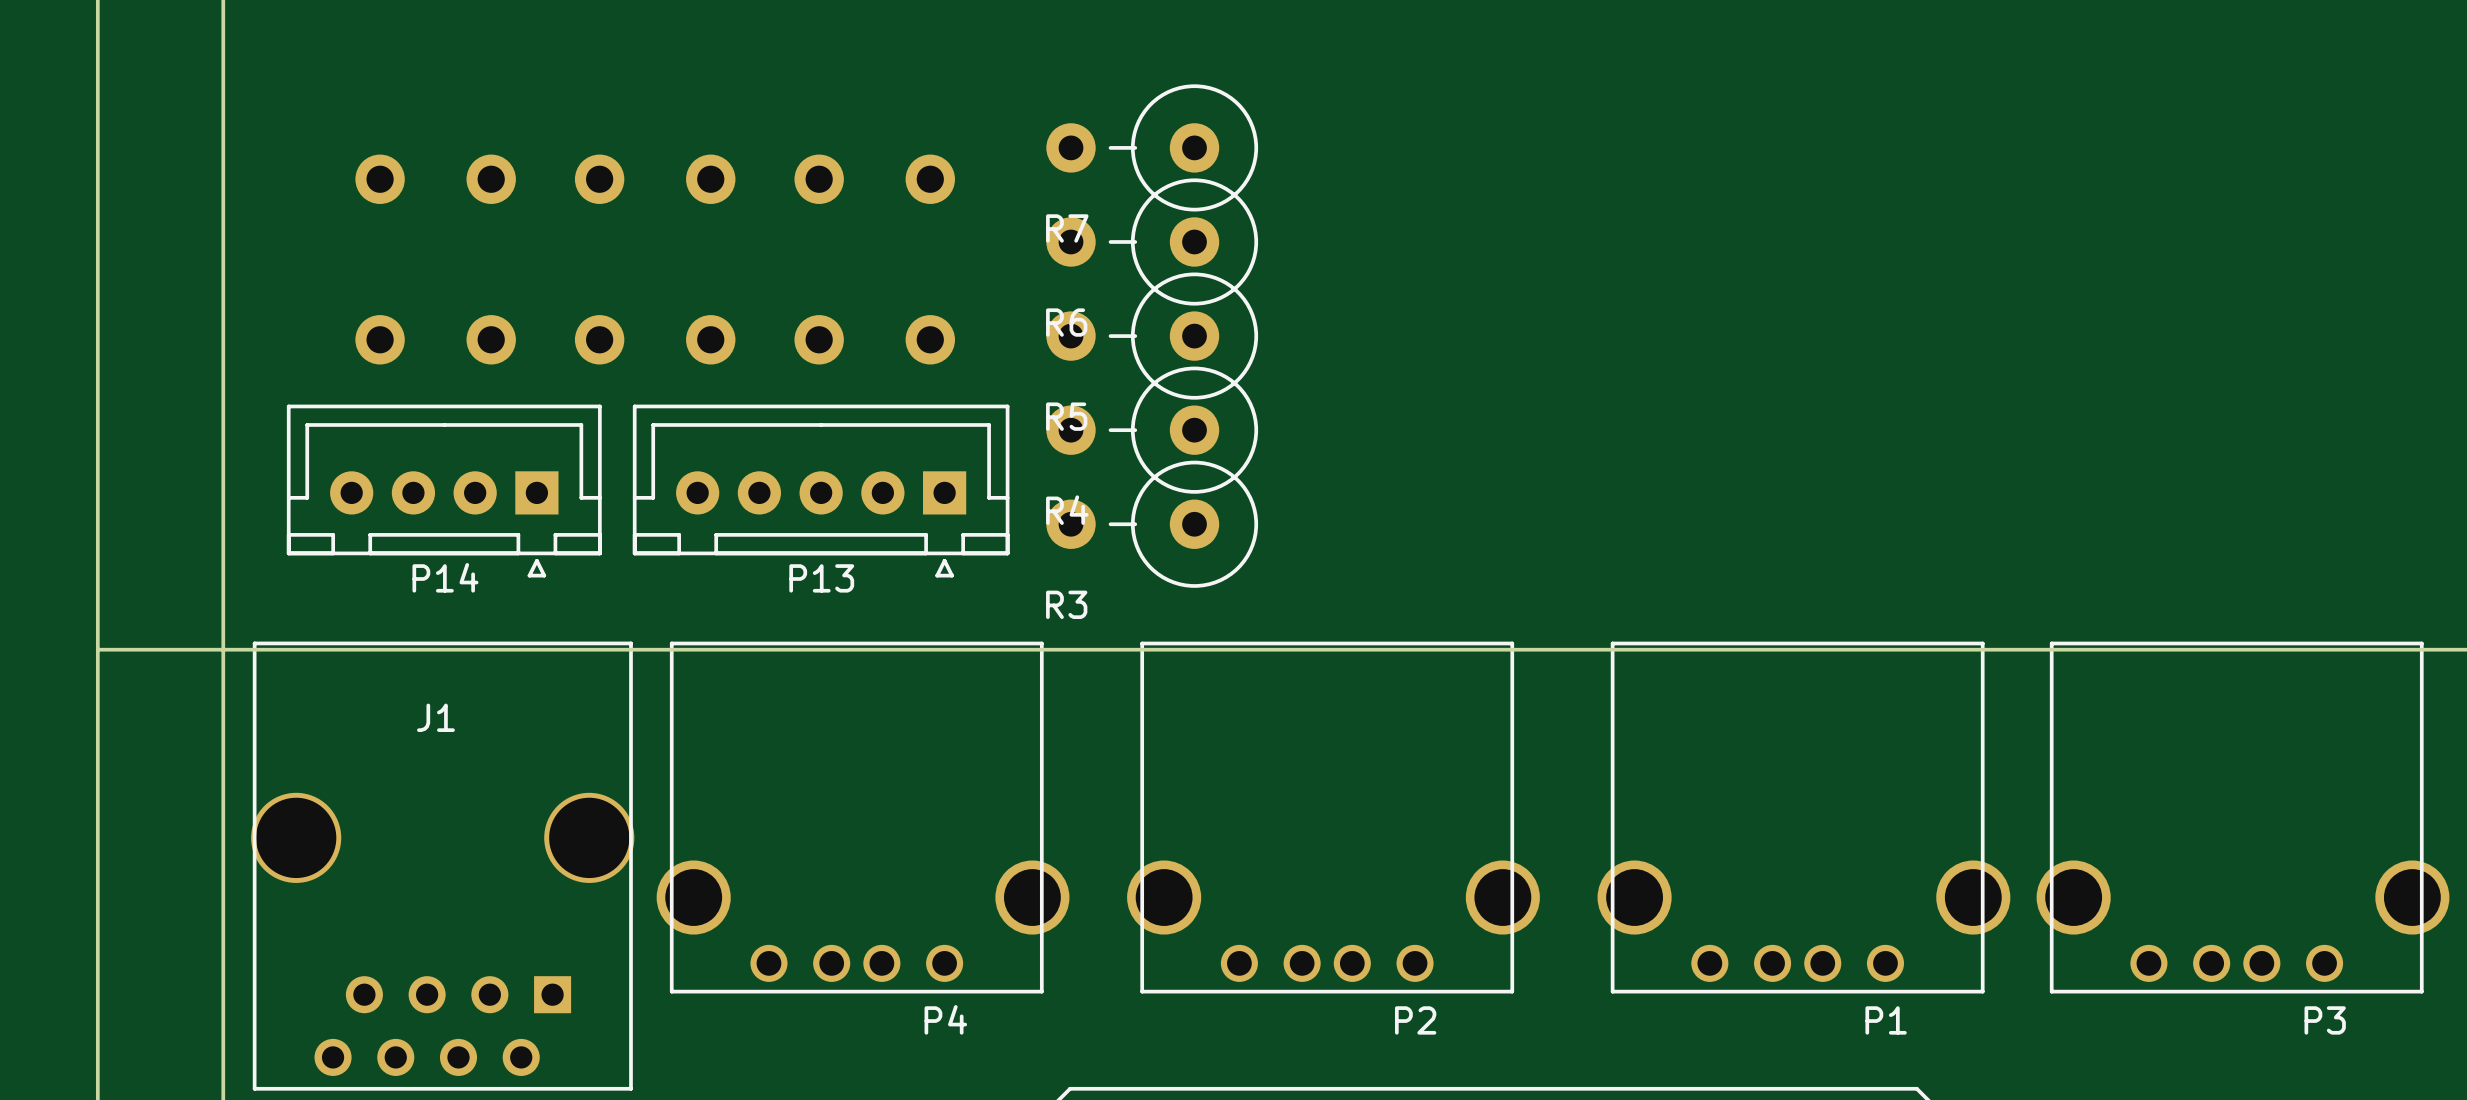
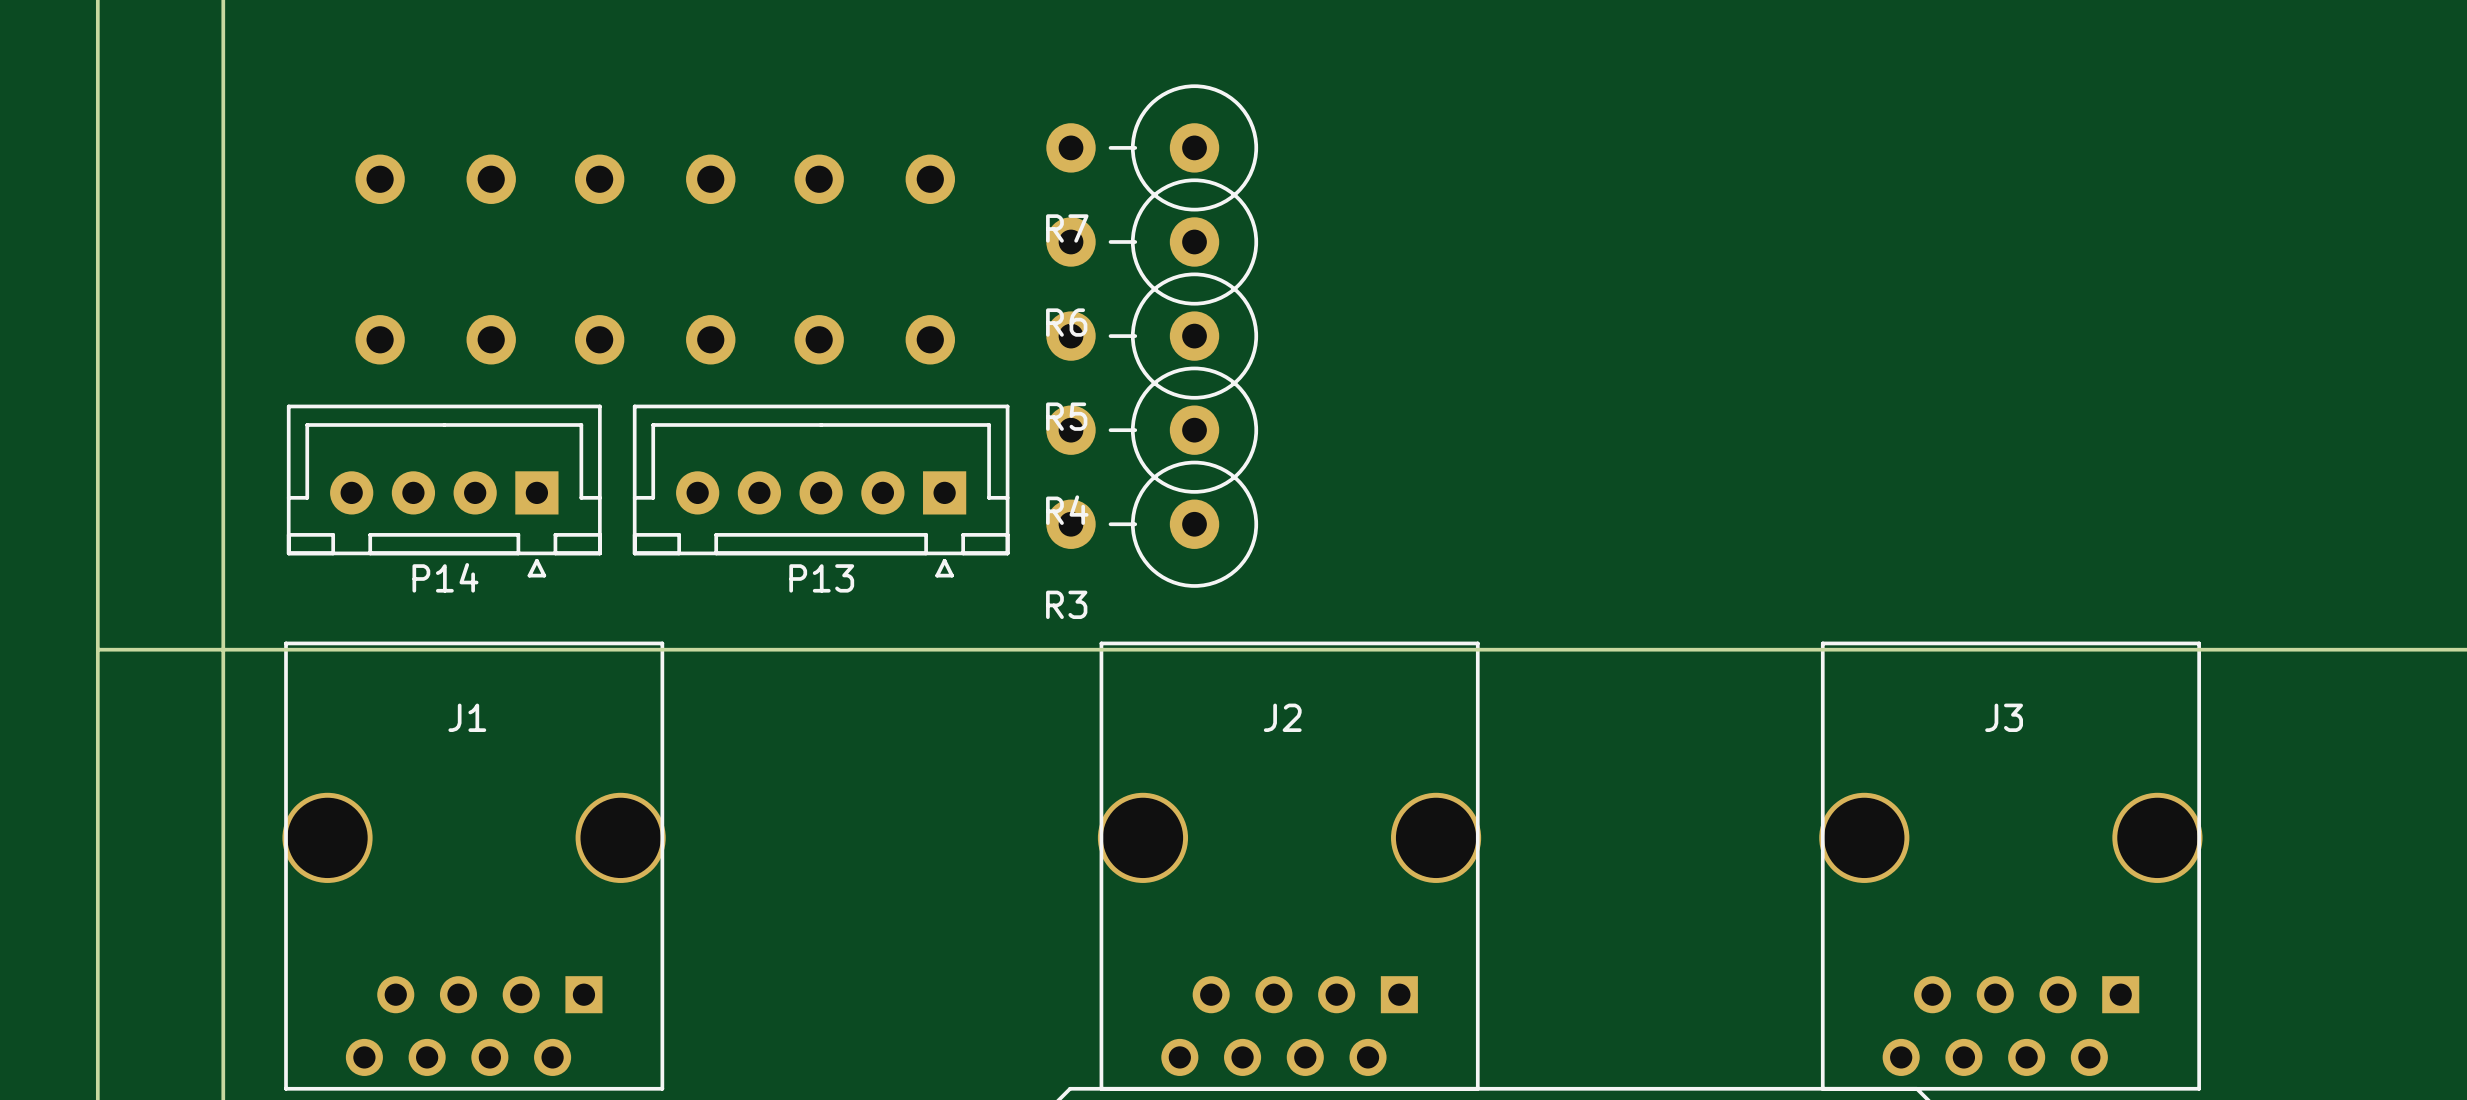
P4: (863, 817) -> none
P2: (1333, 817) -> none
P1: (1803, 817) -> none
P3: (2243, 817) -> none
J1 position: (442, 866) -> (474, 866)
J2: none -> (1289, 866)
J3: none -> (2010, 866)

